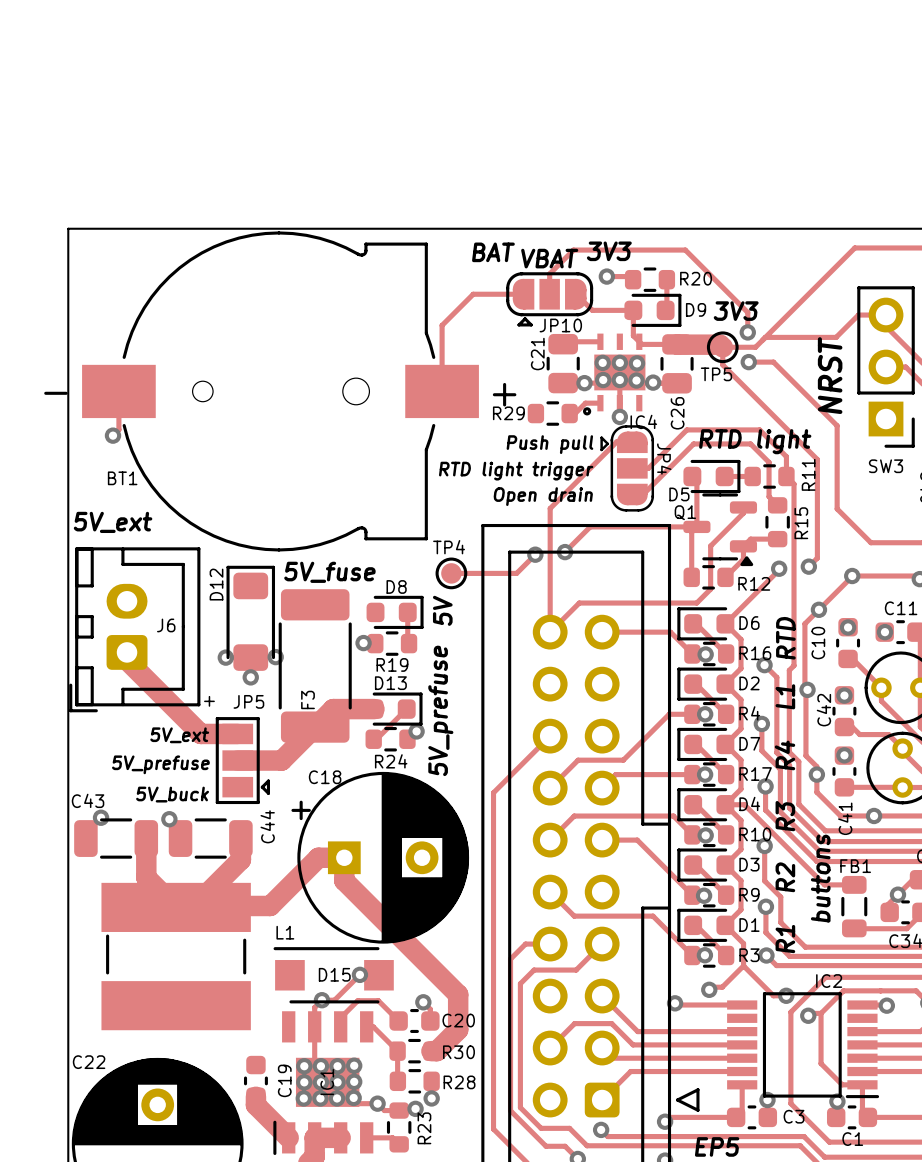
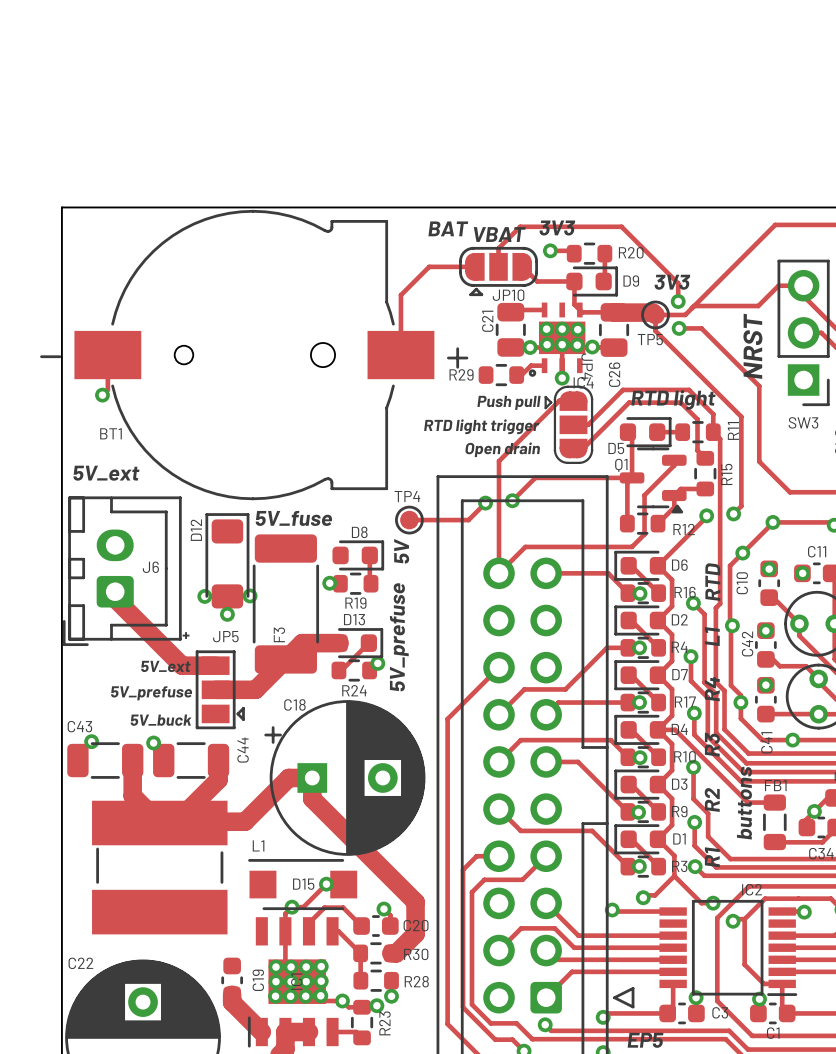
JP4 name position: JP4 (664, 459) -> JP4 (587, 366)

